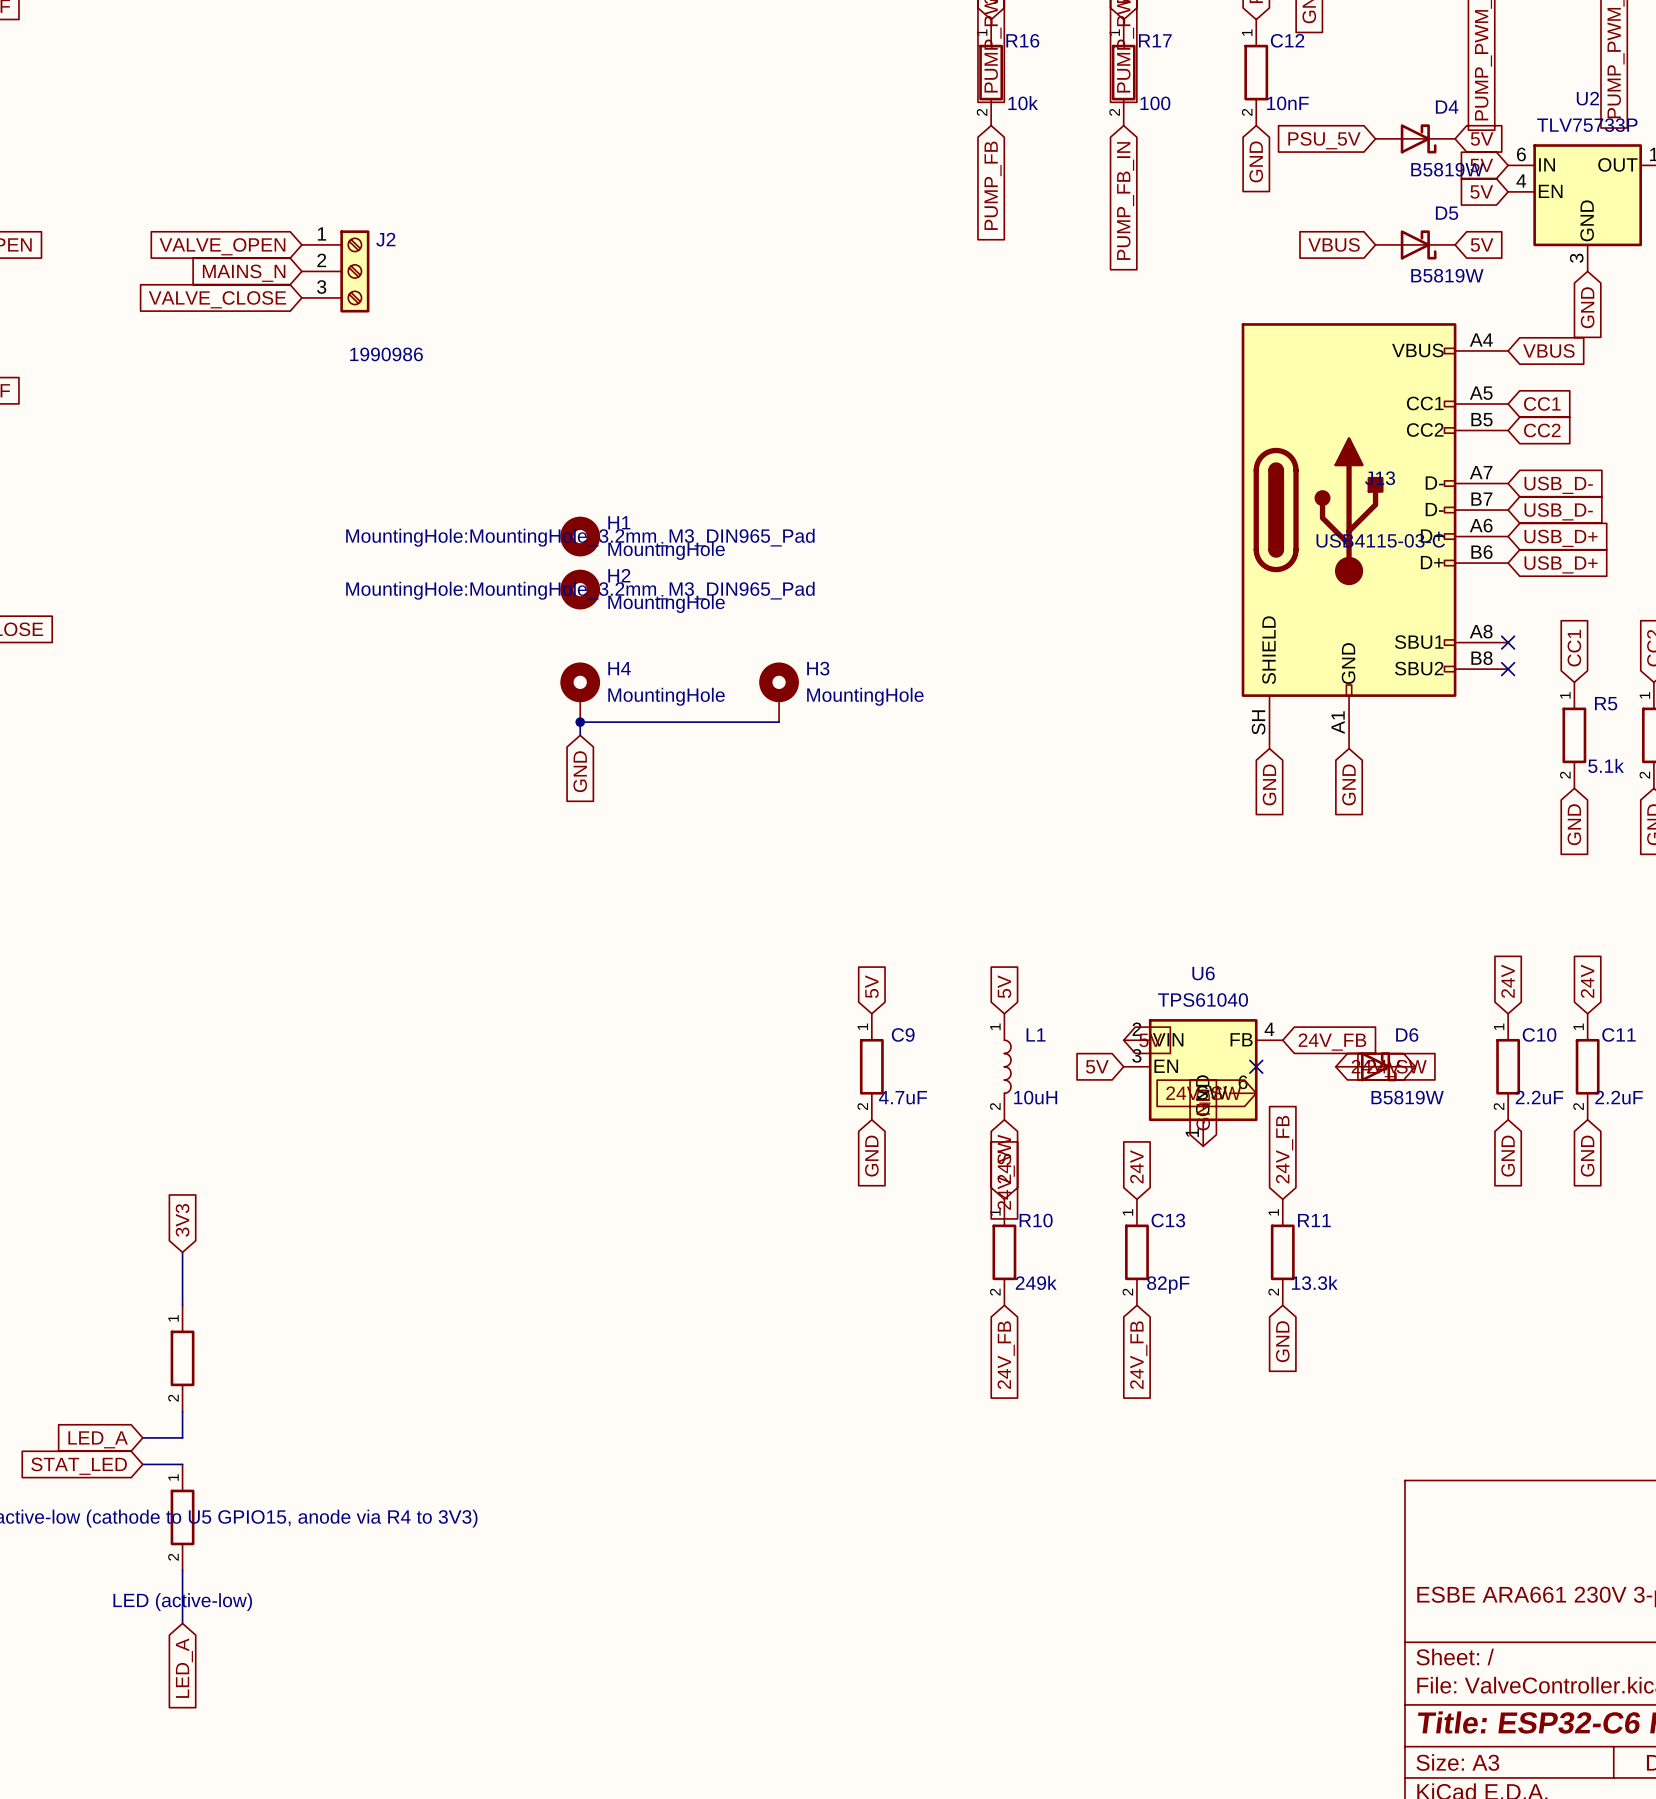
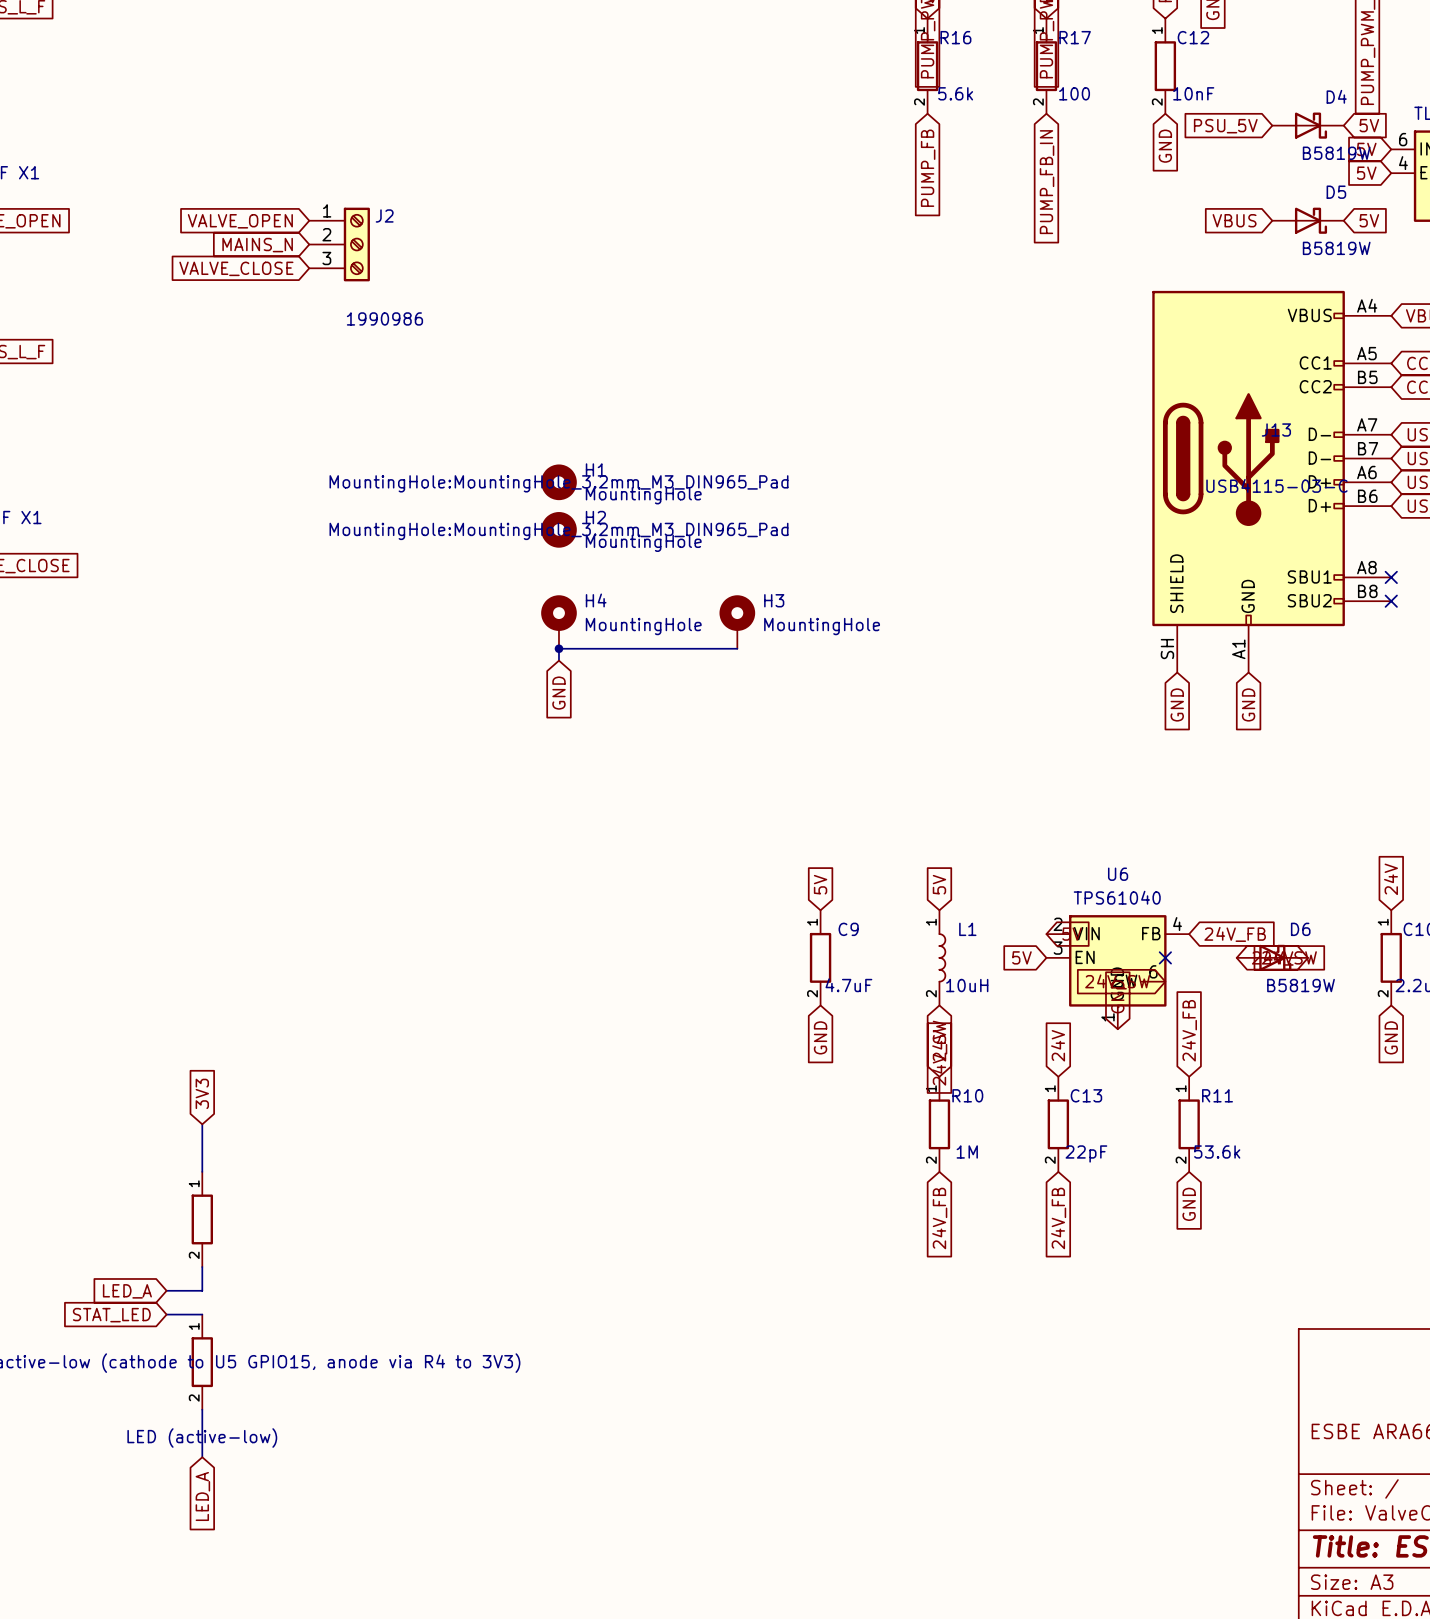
R16 value: 10k (1023, 103) -> 5.6k (955, 93)
R10 value: 249k (1036, 1282) -> 1M (967, 1151)
R11 value: 13.3k (1314, 1282) -> 53.6k (1217, 1151)
C13 value: 82pF (1168, 1285) -> 22pF (1086, 1153)

